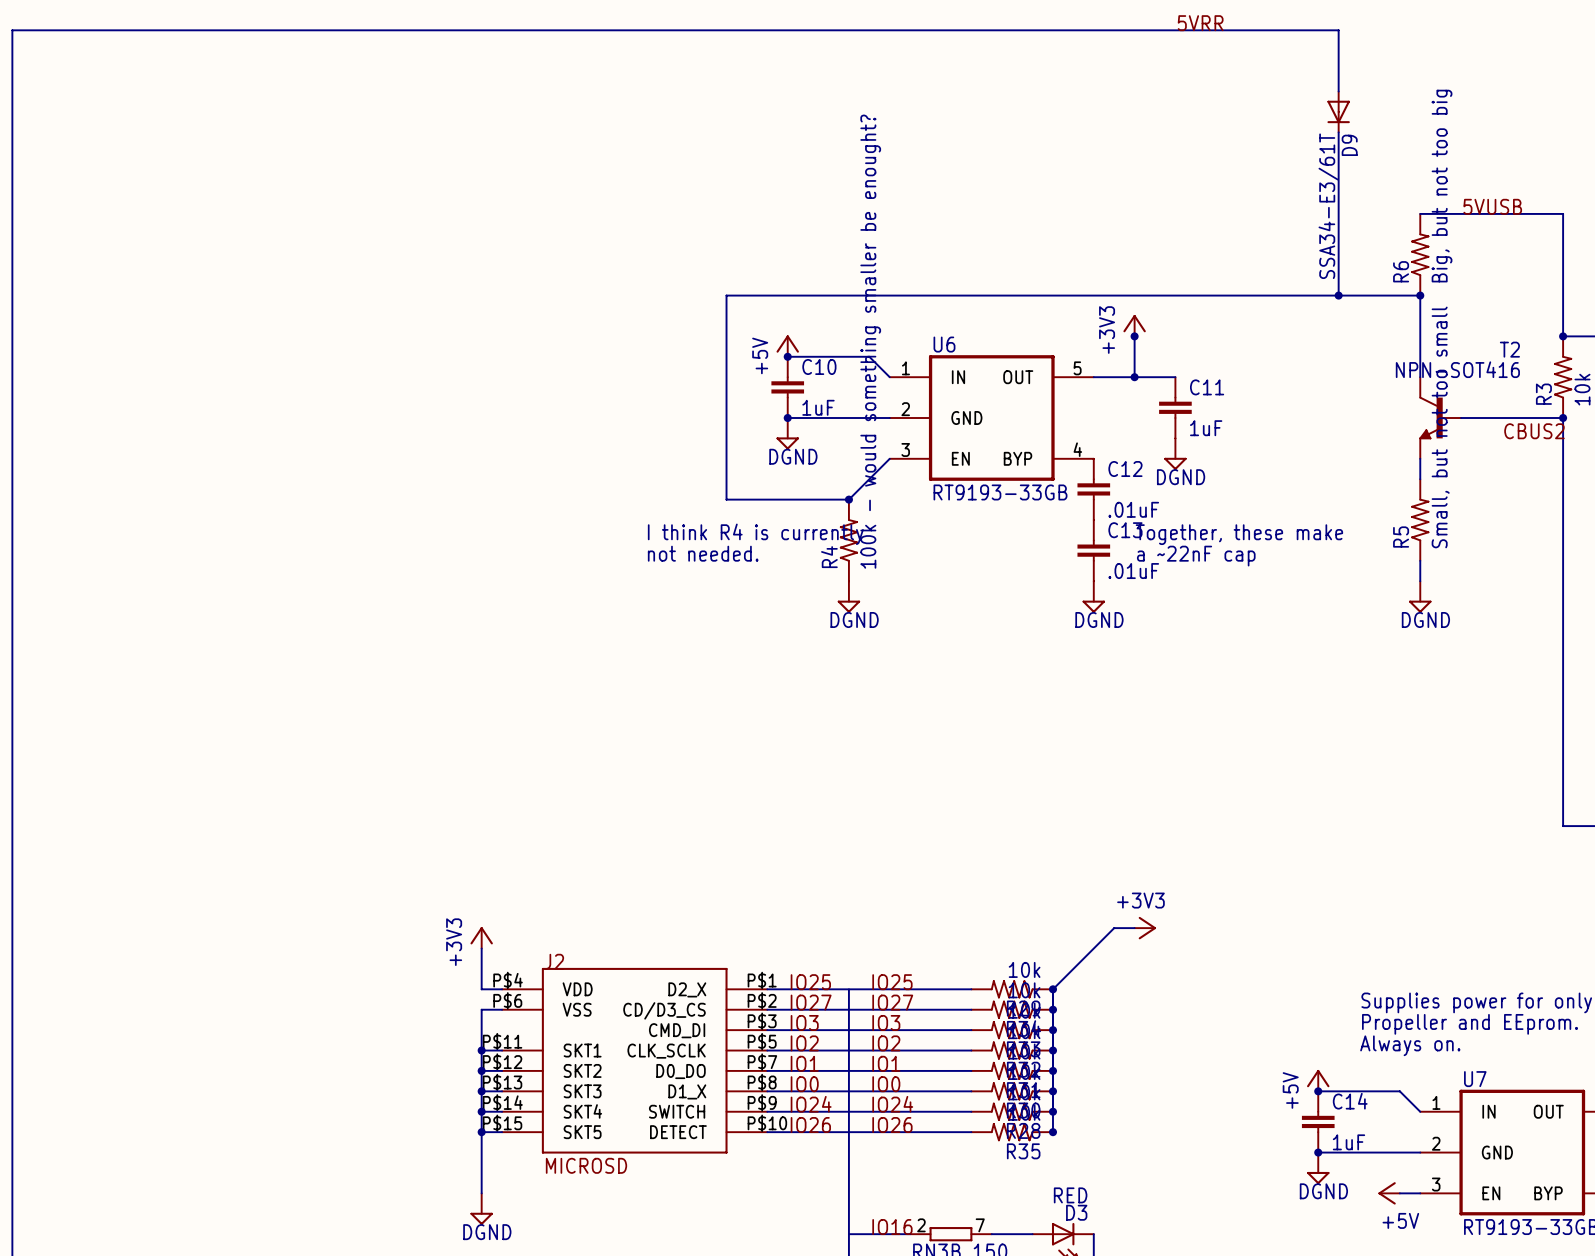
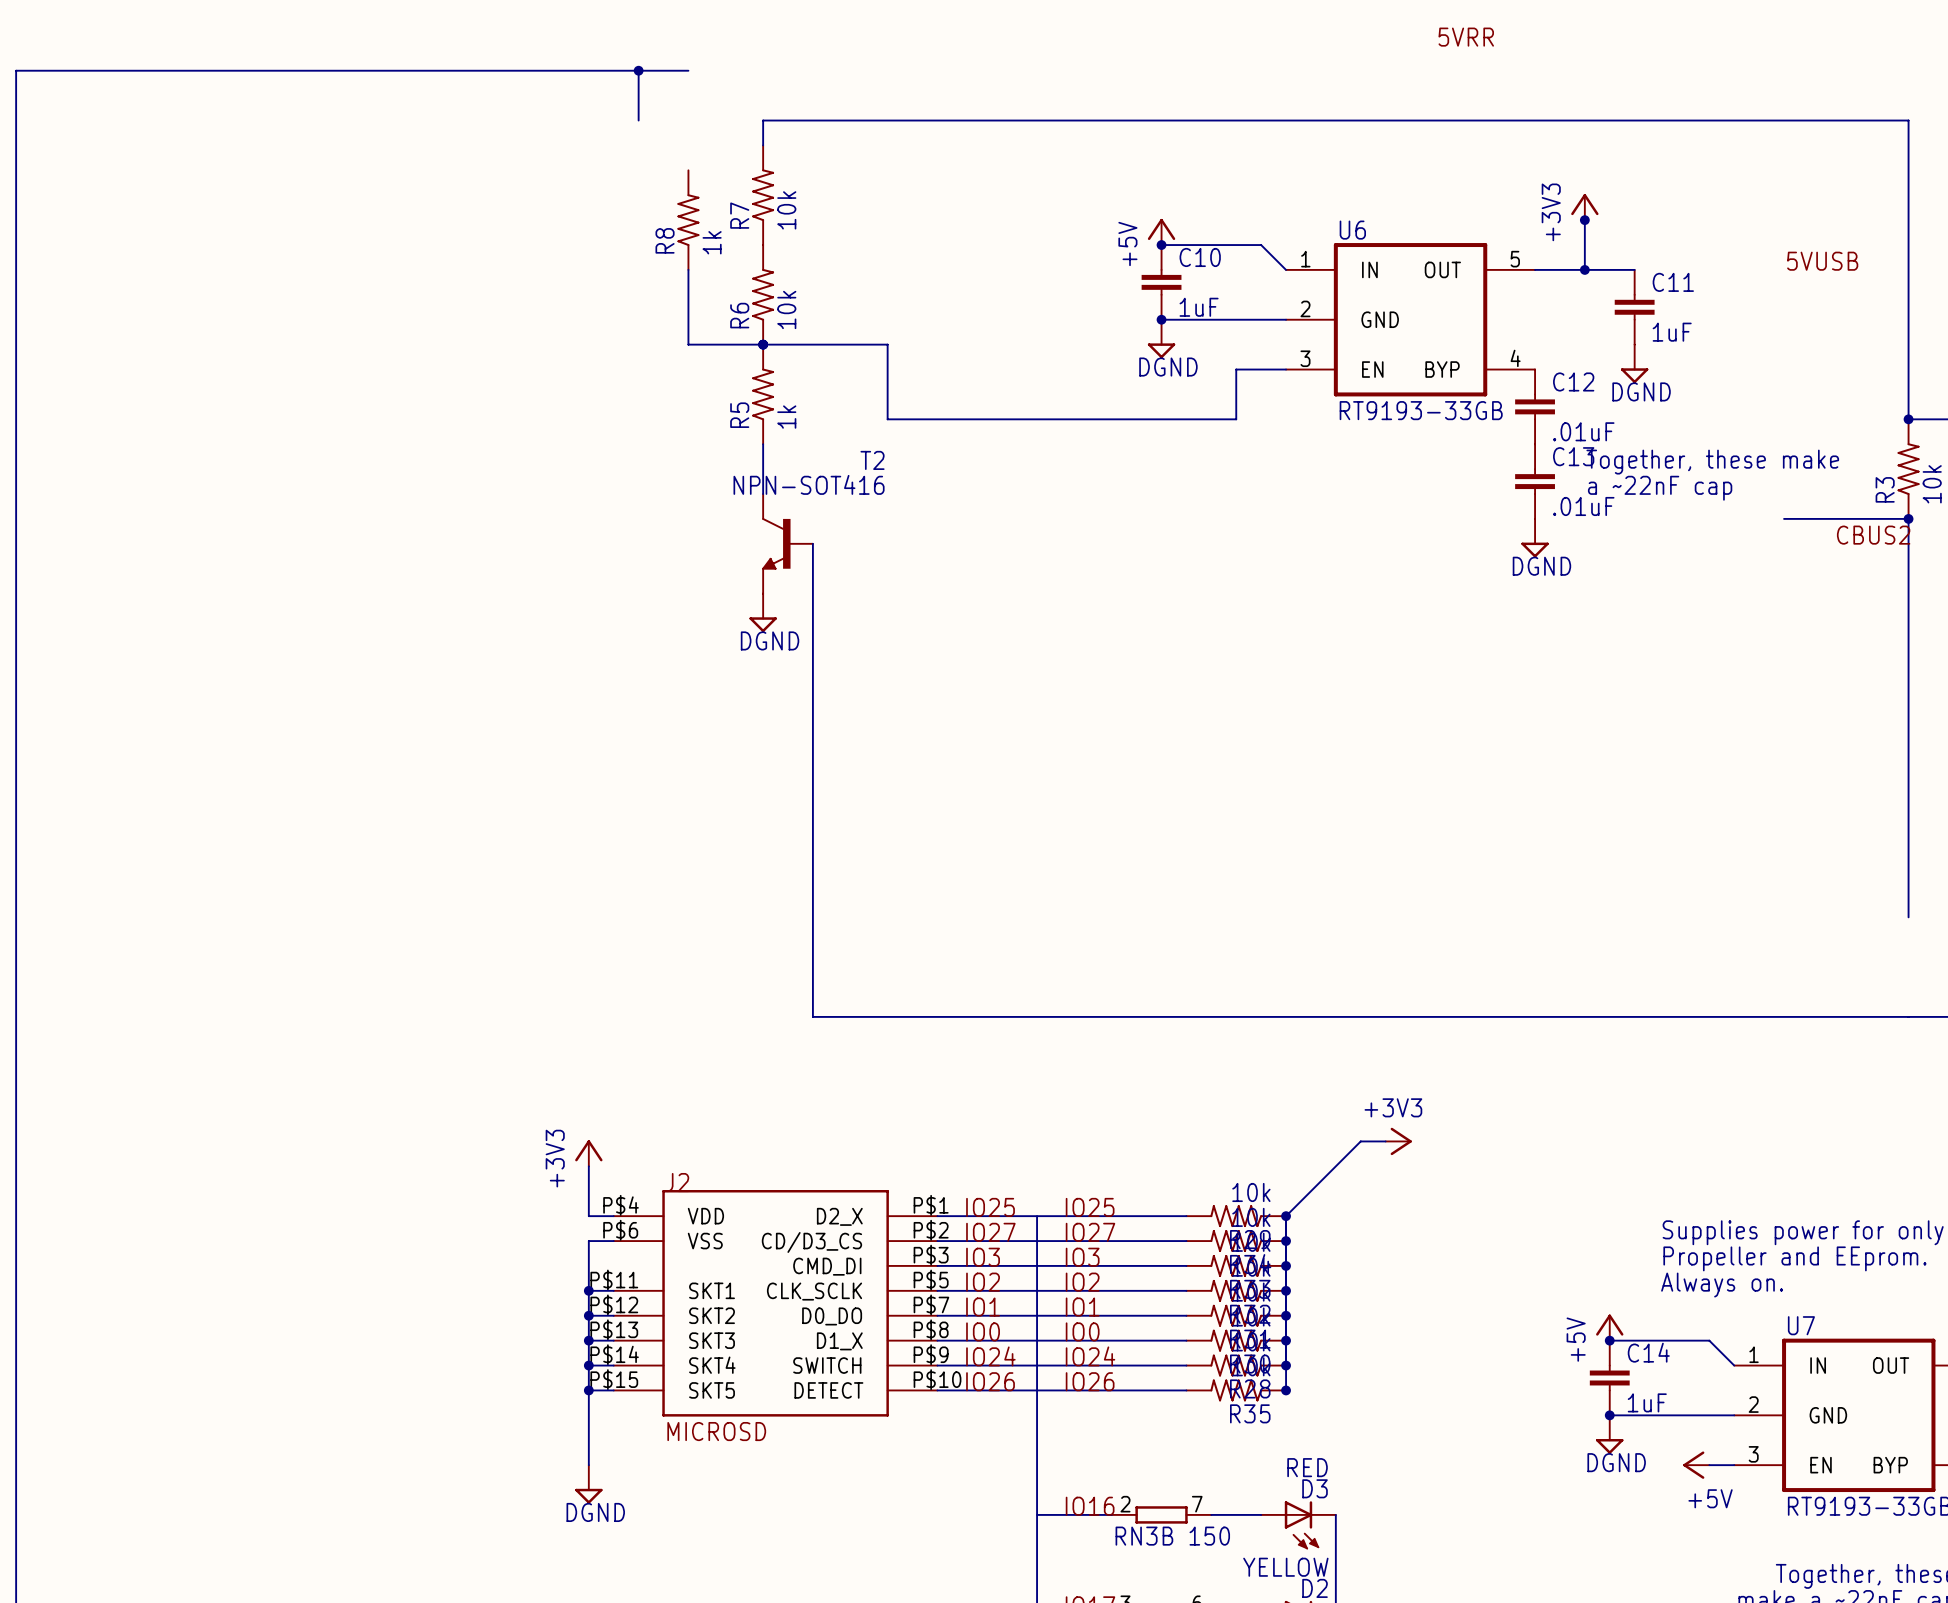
wire: (12, 50) (12, 30) (1338, 30) (1338, 91) -> (16, 70) (688, 70)
wire: none -> (638, 70) (638, 120)
junction: none -> (638, 70)
D9: SSA34-E3/61T (1338, 111) -> none
wire: (1338, 132) (1338, 295) -> none
R7: none -> 10k (763, 195)
power symbol: none -> +3V3 (1584, 207)
R8: none -> 1k (688, 220)
wire: none -> (1584, 220) (1584, 269)
junction: none -> (1584, 220)
power symbol: none -> +5V (1161, 231)
R6 value: Big, but not too big (1442, 186) -> 10k (786, 309)
wire: none -> (1161, 245) (1261, 245) (1286, 269)
junction: none -> (1161, 245)
wire: none -> (688, 269) (688, 344) (887, 344) (887, 369)
wire: none -> (1535, 269) (1634, 269)
junction: none -> (1584, 269)
wire: (1420, 213) (1563, 213) -> (763, 145) (763, 120) (1908, 120) (1908, 269)
wire: none -> (1161, 319) (1286, 319)
junction: none -> (1161, 319)
R6 position: (1420, 254) -> (763, 294)
power symbol: none -> DGND (1161, 339)
junction: none -> (763, 344)
power symbol: none -> DGND (1634, 363)
wire: (726, 295) (1012, 295) -> (887, 419) (1236, 419) (1236, 369)
wire: (1052, 295) (1420, 295) (1420, 377) -> none
junction: (1338, 295) -> none
junction: (1420, 295) -> none
power symbol: +3V3 (1134, 325) -> none
wire: (726, 336) (726, 499) (848, 499) (889, 458) -> none
wire: (1134, 336) (1134, 377) -> none
junction: (1134, 336) -> none
power symbol: +5V (787, 346) -> none
wire: none -> (763, 444) (763, 494)
wire: (787, 356) (869, 356) (889, 377) -> none
junction: (787, 356) -> none
text: none -> Together, these make (1712, 462)
wire: (1093, 377) (1175, 377) -> none
junction: (1134, 377) -> none
C10 position: (787, 387) -> (1161, 282)
text: none -> a ~22nF cap (1660, 488)
C11 position: (1175, 407) -> (1634, 307)
wire: (787, 418) (889, 418) -> none
junction: (787, 418) -> none
U6 position: (991, 418) -> (1410, 319)
T2 position: (1440, 418) -> (787, 543)
R5 value: Small, but not too small (1440, 427) -> 1k (786, 417)
power symbol: DGND (787, 433) -> none
power symbol position: DGND (1175, 454) -> DGND (1535, 538)
wire: (1420, 458) (1420, 479) -> none
C12 position: (1093, 489) -> (1535, 406)
power symbol: none -> DGND (763, 612)
junction: (848, 499) -> none
R5 position: (1420, 520) -> (763, 394)
text: I think R4 is currently (755, 534) -> none
text: Together, these make (1239, 534) -> none
R4: 100k - would something smaller be enought? (848, 540) -> none
C13 position: (1093, 550) -> (1535, 481)
text: not needed. (703, 553) -> none
text: a ~22nF cap (1196, 556) -> none
wire: (1420, 560) (1420, 581) -> none
power symbol: DGND (848, 597) -> none
power symbol: DGND (1093, 597) -> none
power symbol: DGND (1420, 597) -> none
wire: (1563, 744) (1563, 826) -> (812, 543) (812, 1016) (1908, 1016)

